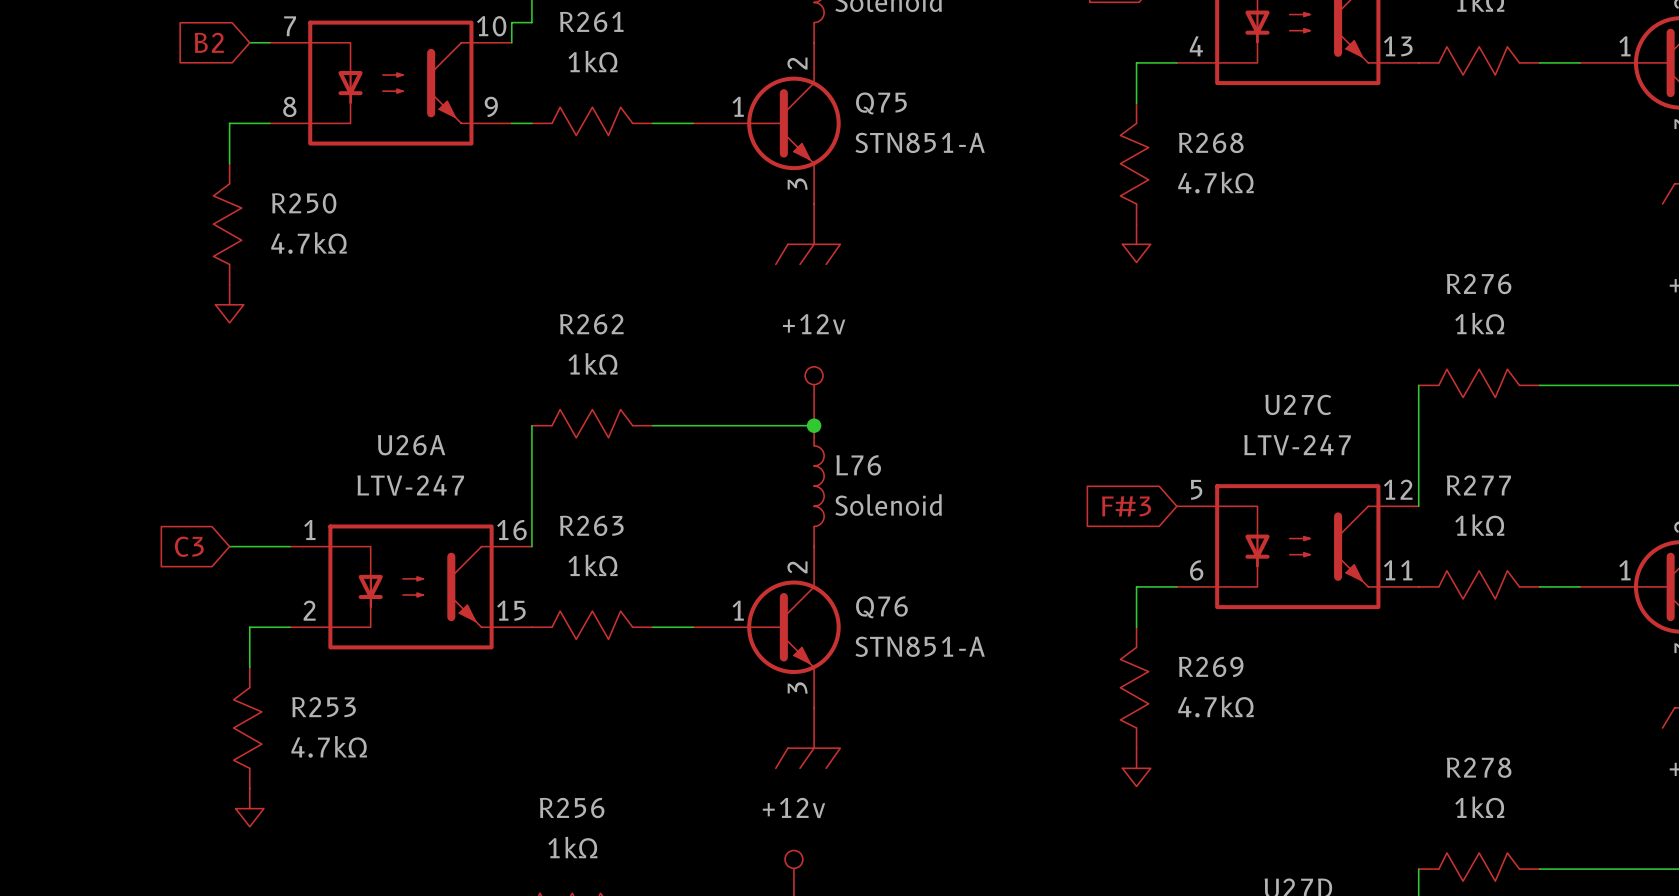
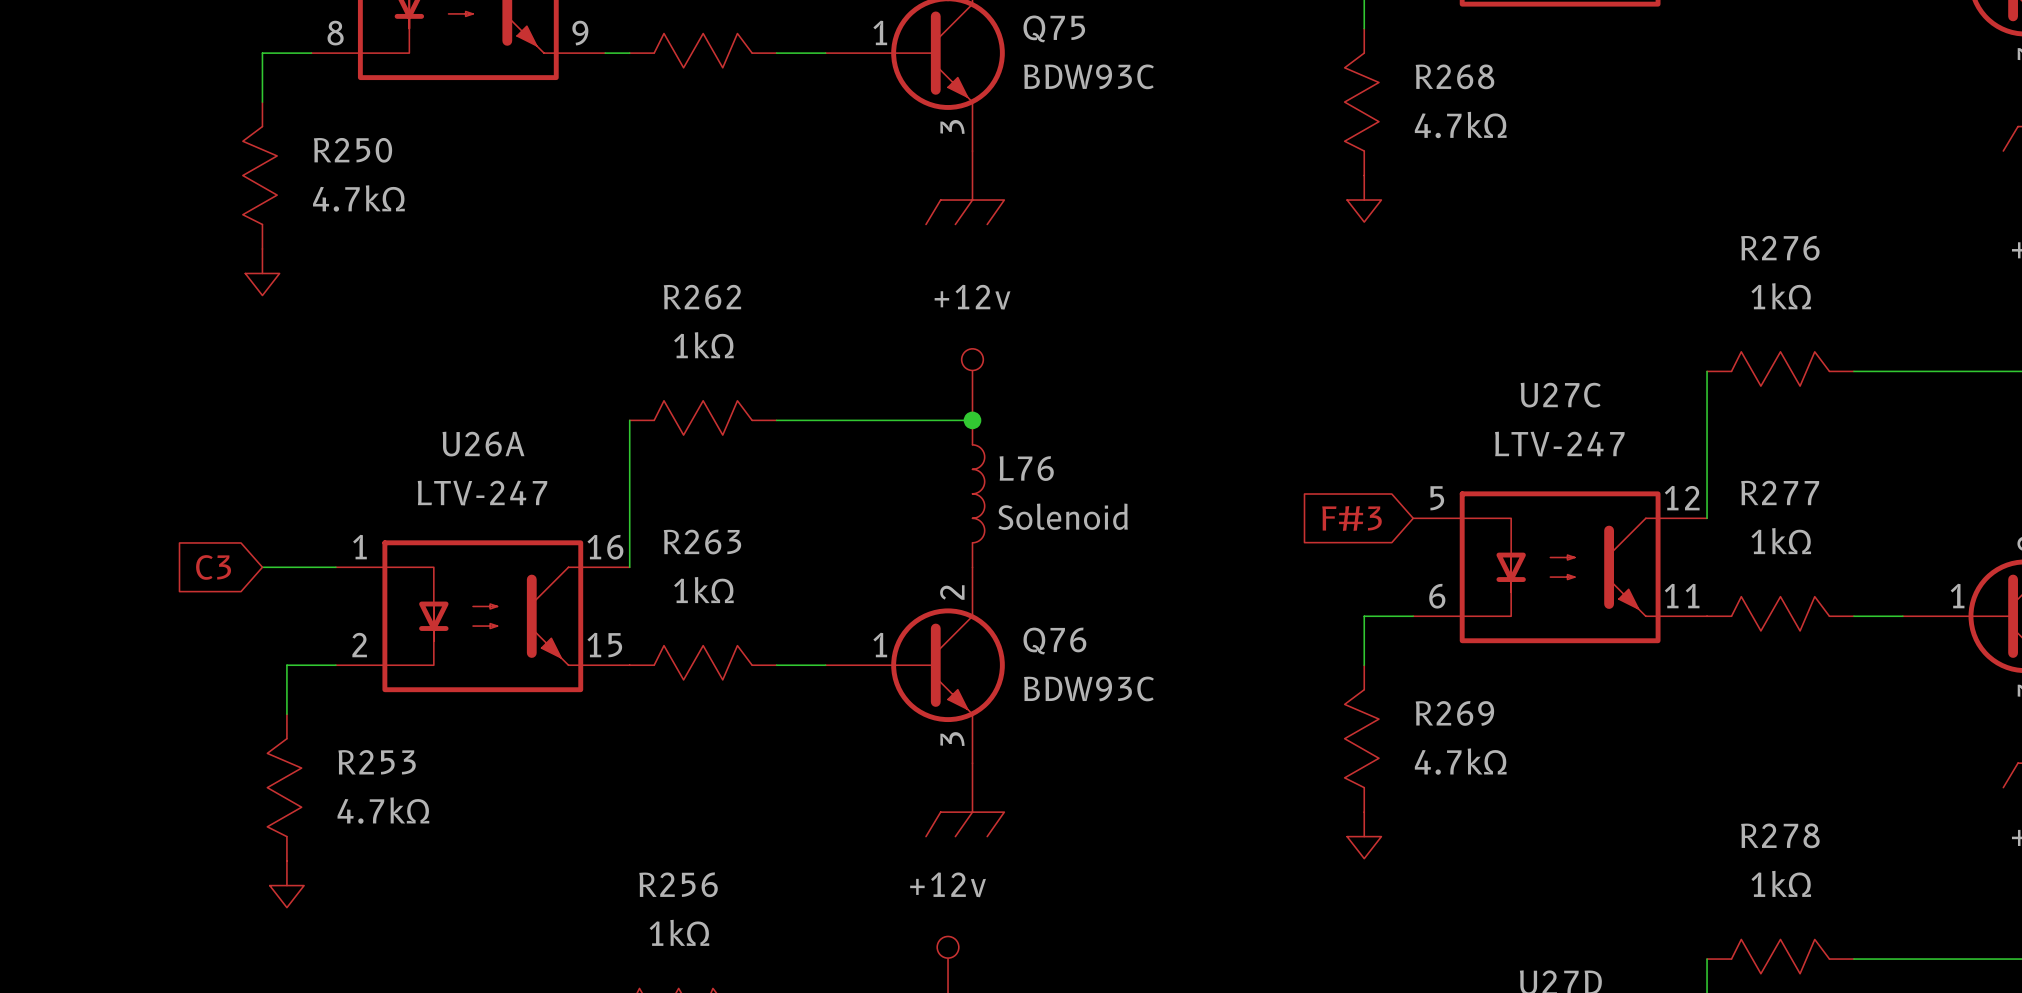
Q75 value: STN851-A (920, 142) -> BDW93C (1088, 76)
Q76 value: STN851-A (920, 646) -> BDW93C (1088, 688)

